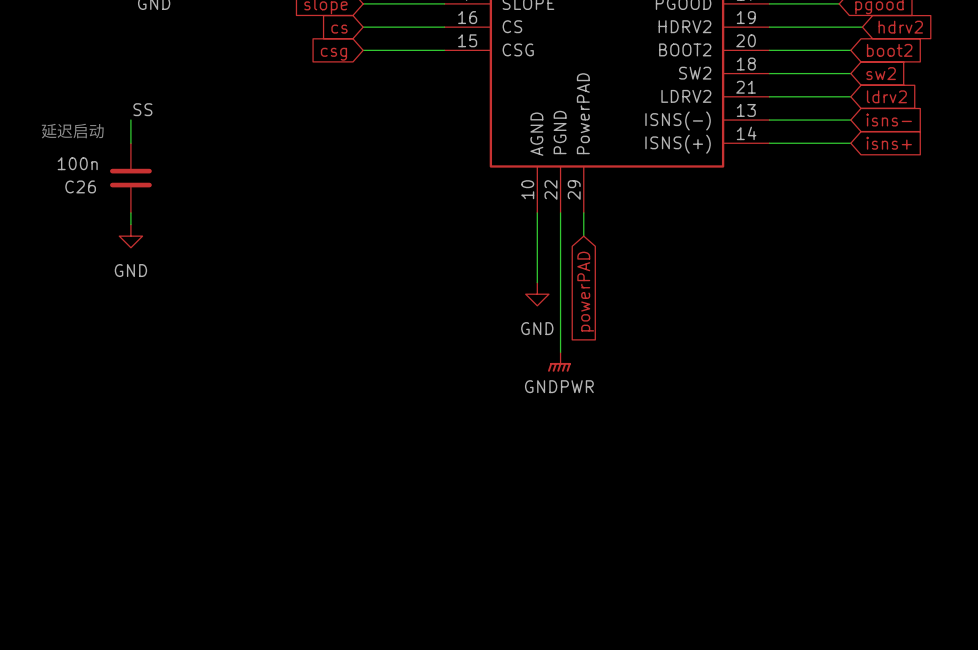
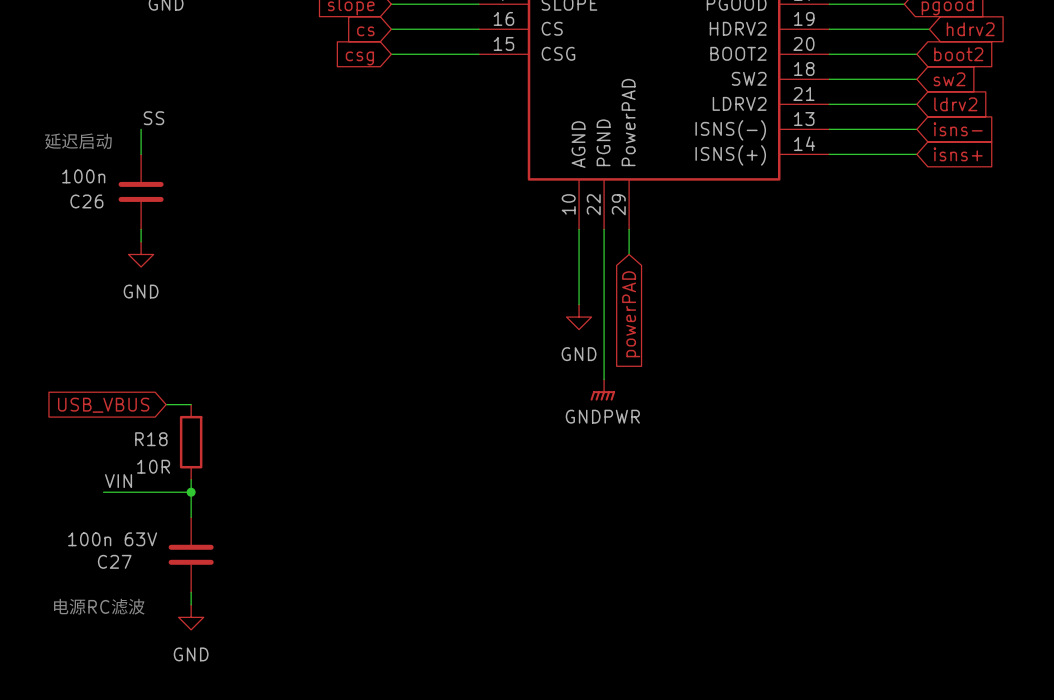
wire: none -> (166, 404) (191, 404)
global label: none -> USB_VBUS (103, 405)
R18: none -> 10R (191, 442)
wire: none -> (191, 479) (191, 517)
label: none -> VIN (118, 481)
wire: none -> (103, 492) (191, 492)
junction: none -> (191, 492)
C27: none -> 100n 63V (191, 554)
wire: none -> (191, 592) (191, 604)
text: none -> 电源RC滤波 (99, 606)
power symbol: none -> GND (191, 617)

